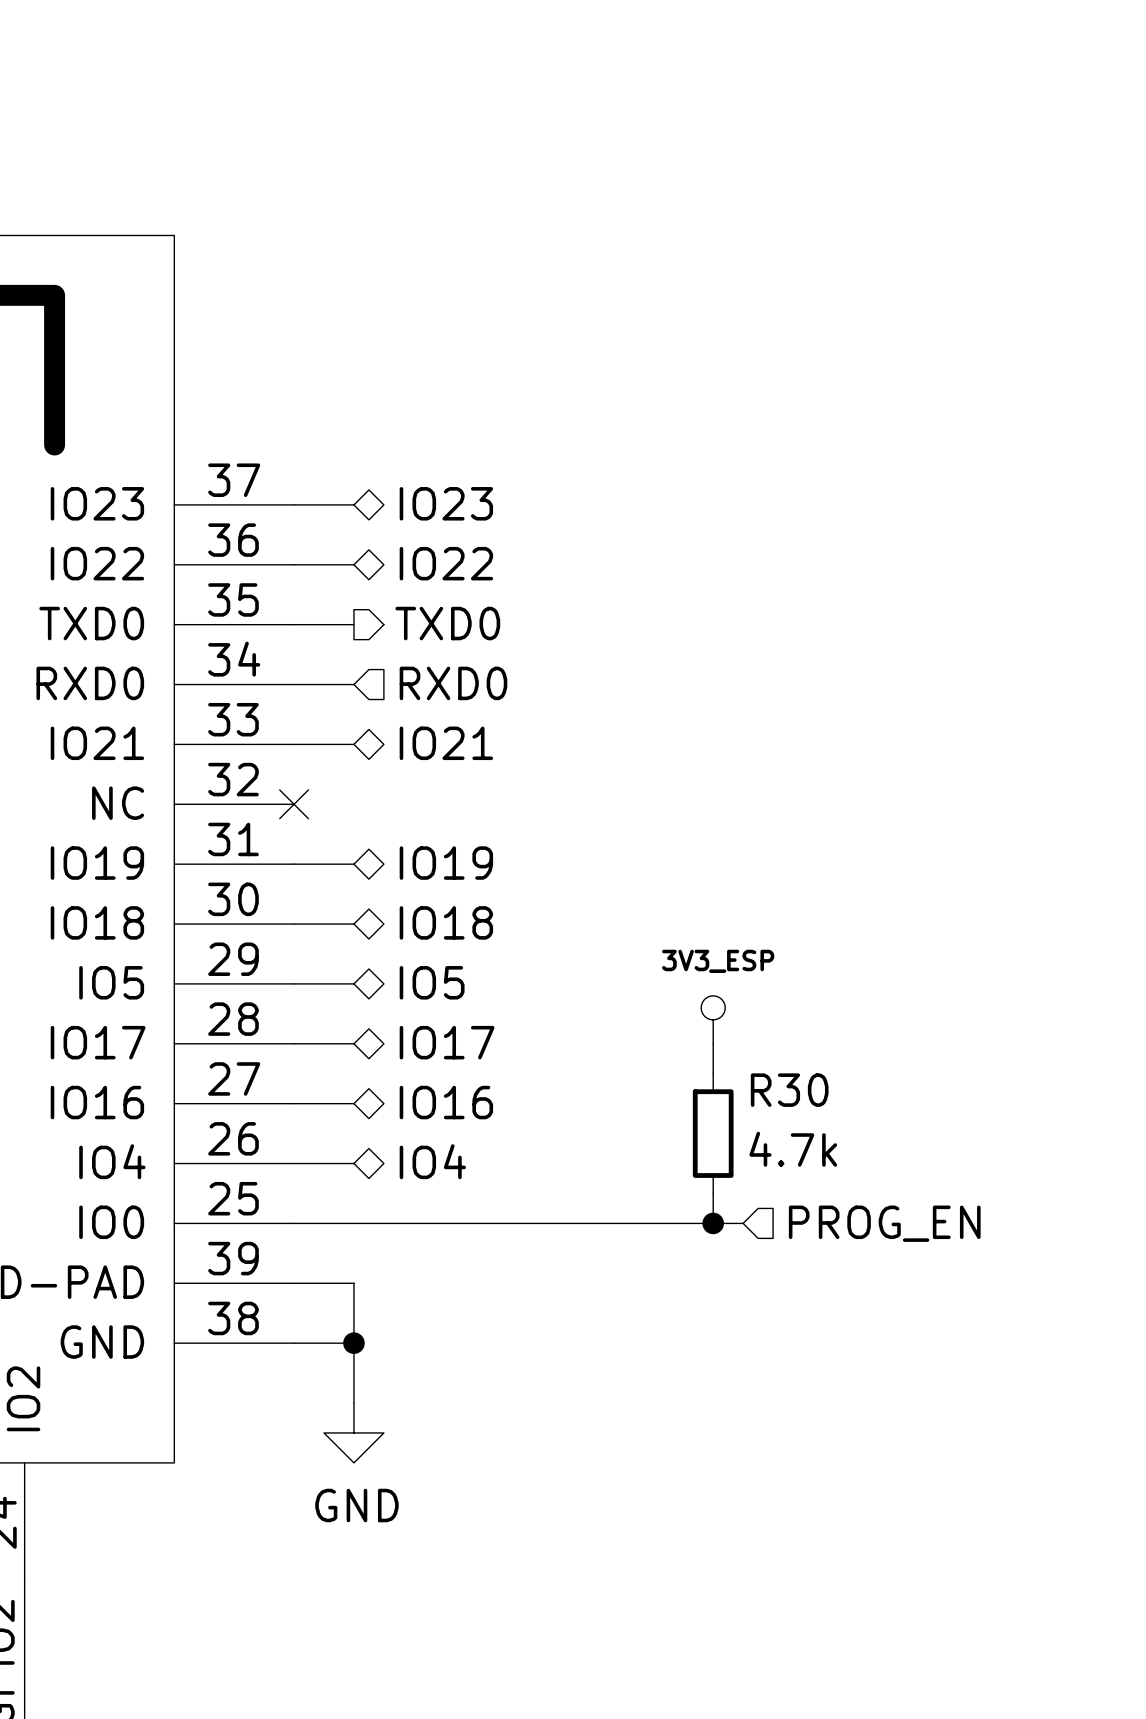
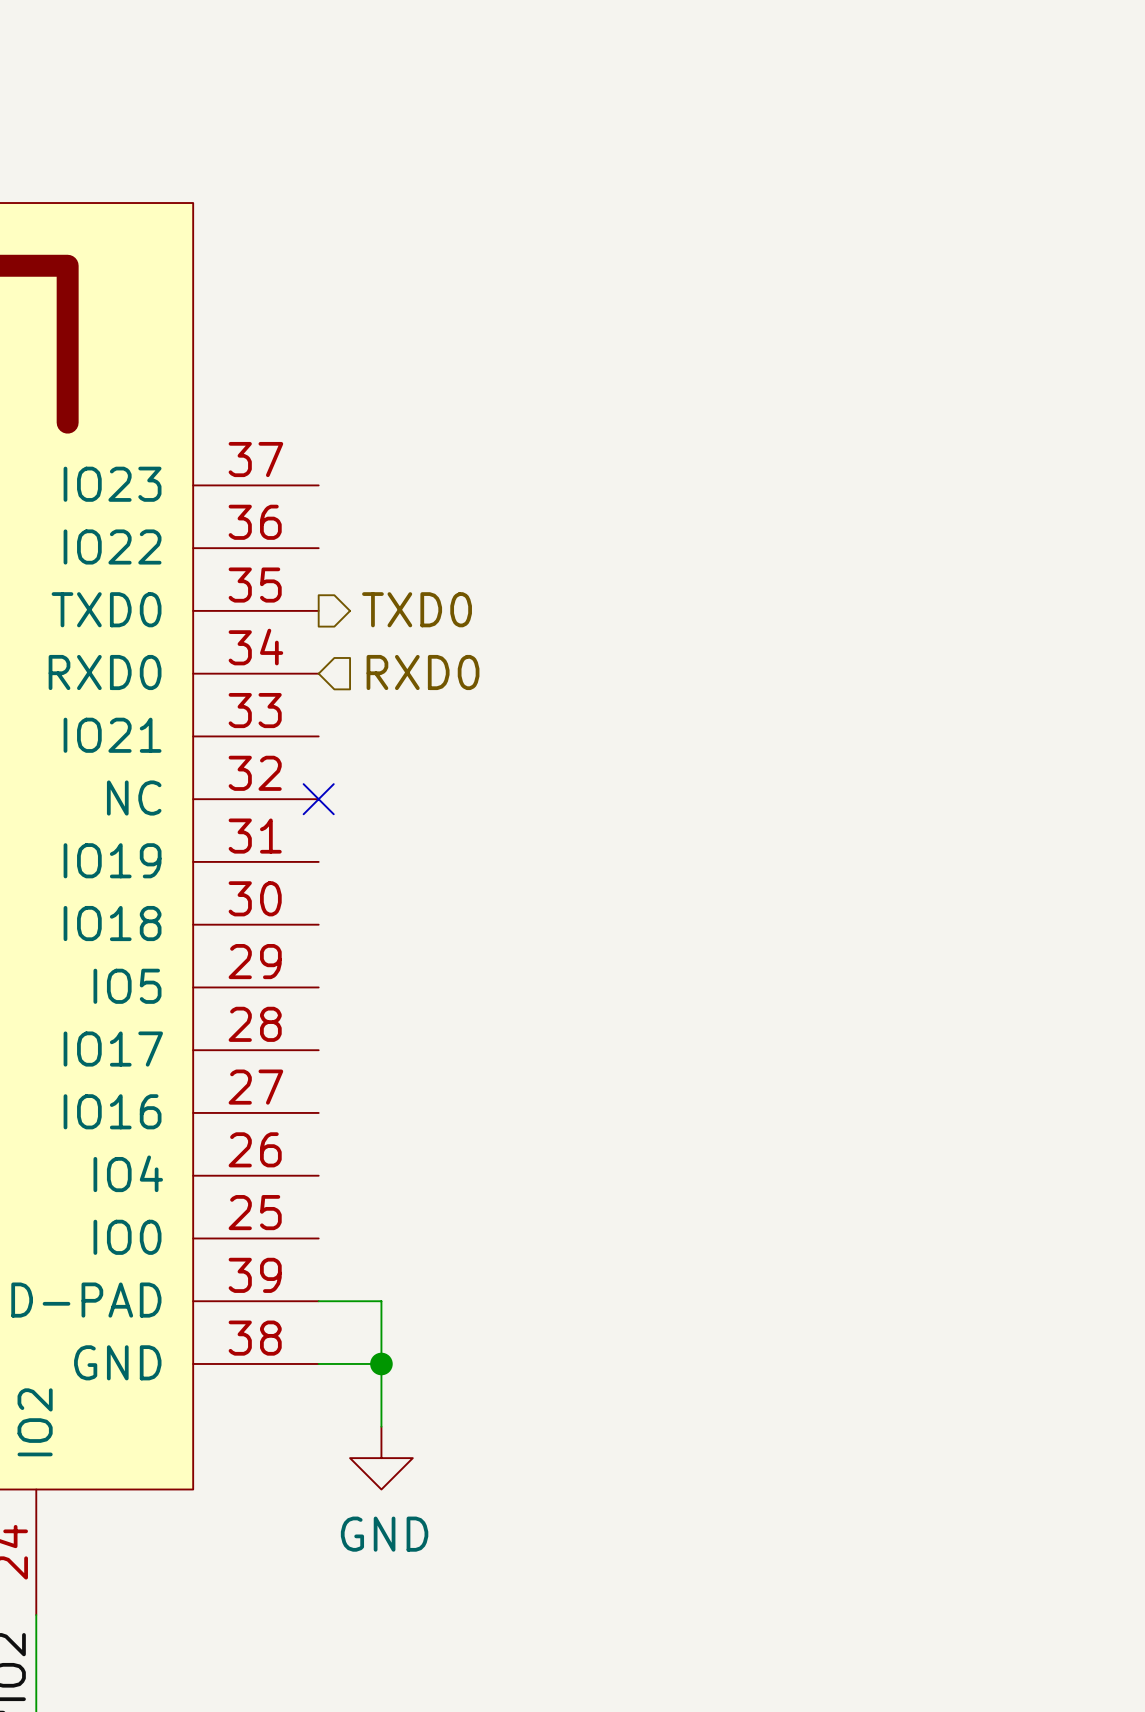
hierarchical label: IO23 (446, 503) -> none
wire: (294, 504) (353, 504) -> none
hierarchical label: IO22 (446, 563) -> none
wire: (294, 564) (353, 564) -> none
hierarchical label position: TXD0 (447, 623) -> TXD0 (417, 609)
wire: (294, 624) (353, 624) -> none
hierarchical label position: RXD0 (453, 683) -> RXD0 (423, 672)
wire: (294, 684) (353, 684) -> none
hierarchical label: IO21 (446, 743) -> none
wire: (294, 744) (353, 744) -> none
hierarchical label: IO19 (446, 863) -> none
wire: (294, 864) (353, 864) -> none
hierarchical label: IO18 (446, 922) -> none
wire: (294, 924) (353, 924) -> none
hierarchical label: IO5 (432, 982) -> none
wire: (294, 983) (353, 983) -> none
power symbol: 3V3_ESP (713, 1019) -> none
hierarchical label: IO17 (447, 1042) -> none
wire: (294, 1043) (353, 1043) -> none
wire: (713, 1043) (713, 1073) -> none
hierarchical label: IO16 (446, 1102) -> none
wire: (294, 1103) (353, 1103) -> none
R30: 4.7k (713, 1133) -> none
hierarchical label: IO4 (432, 1161) -> none
wire: (294, 1163) (353, 1163) -> none
wire: (713, 1193) (713, 1223) -> none
wire: (294, 1223) (743, 1223) -> none
junction: (713, 1223) -> none
hierarchical label: PROG_EN (884, 1223) -> none

